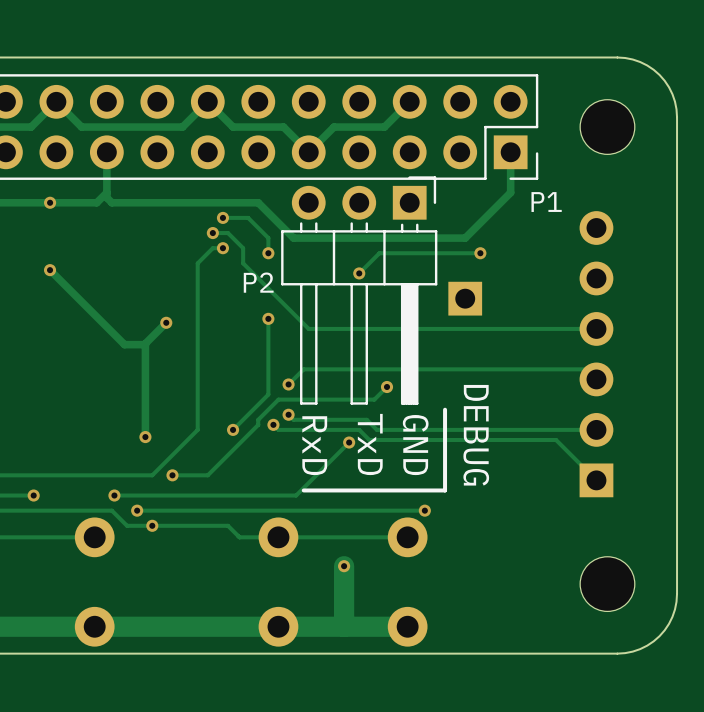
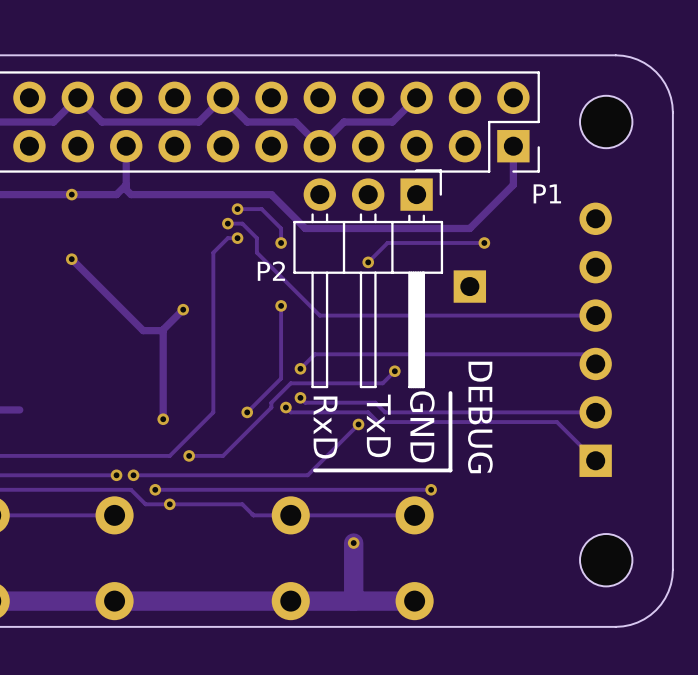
via position: (33, 495) -> (116, 475)
track: none -> (116, 475) (56, 475)

